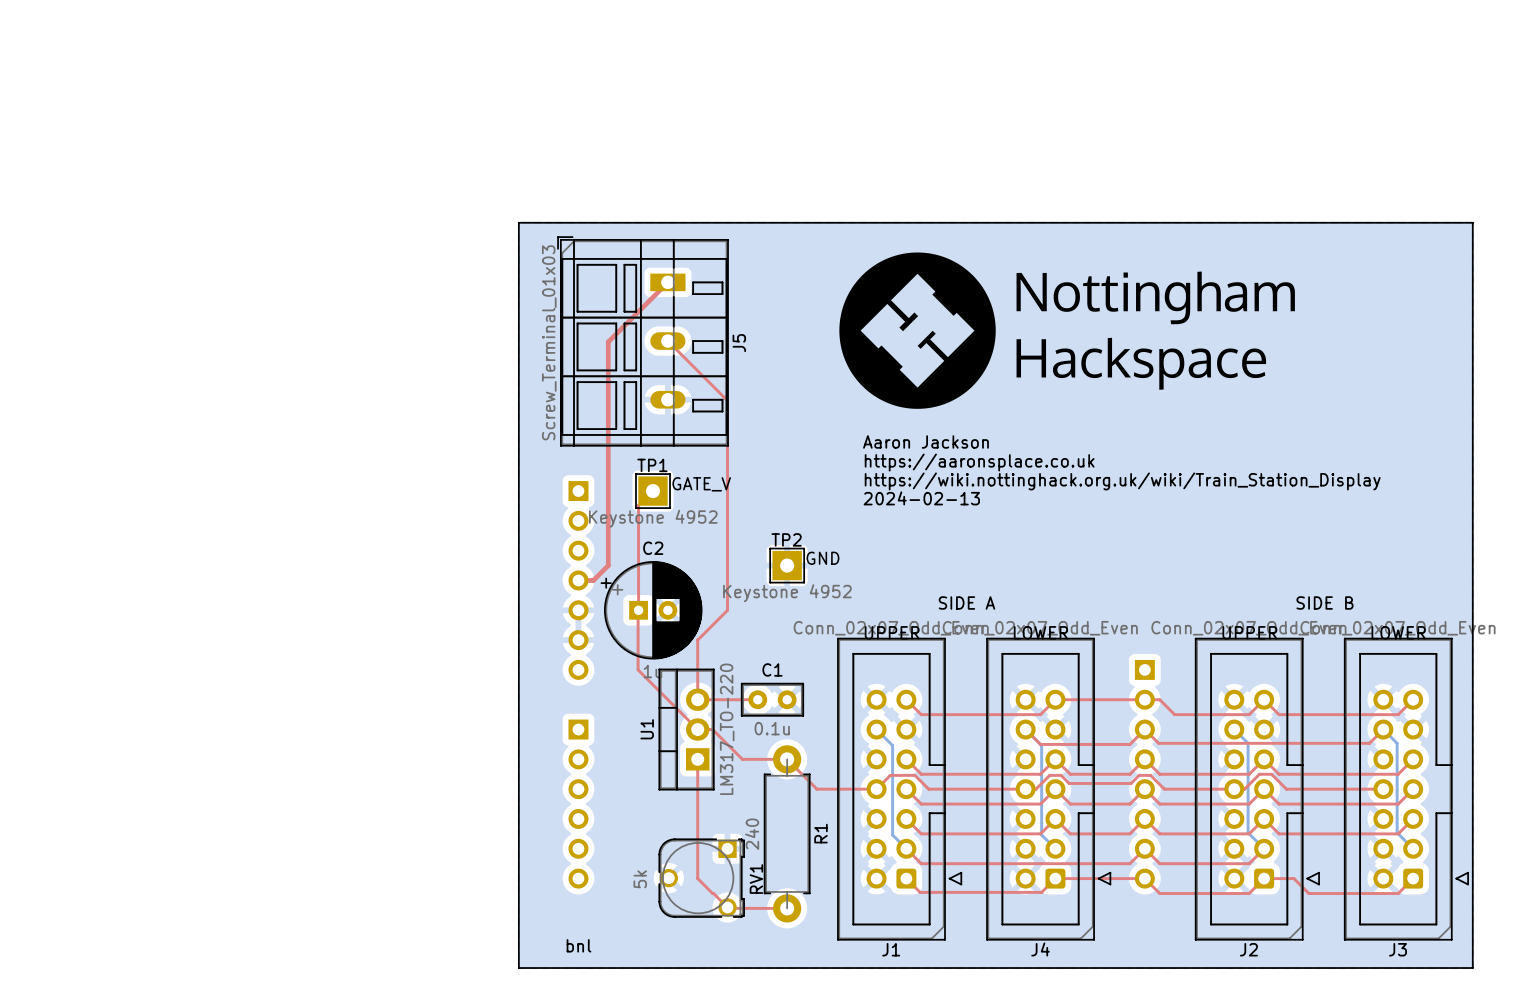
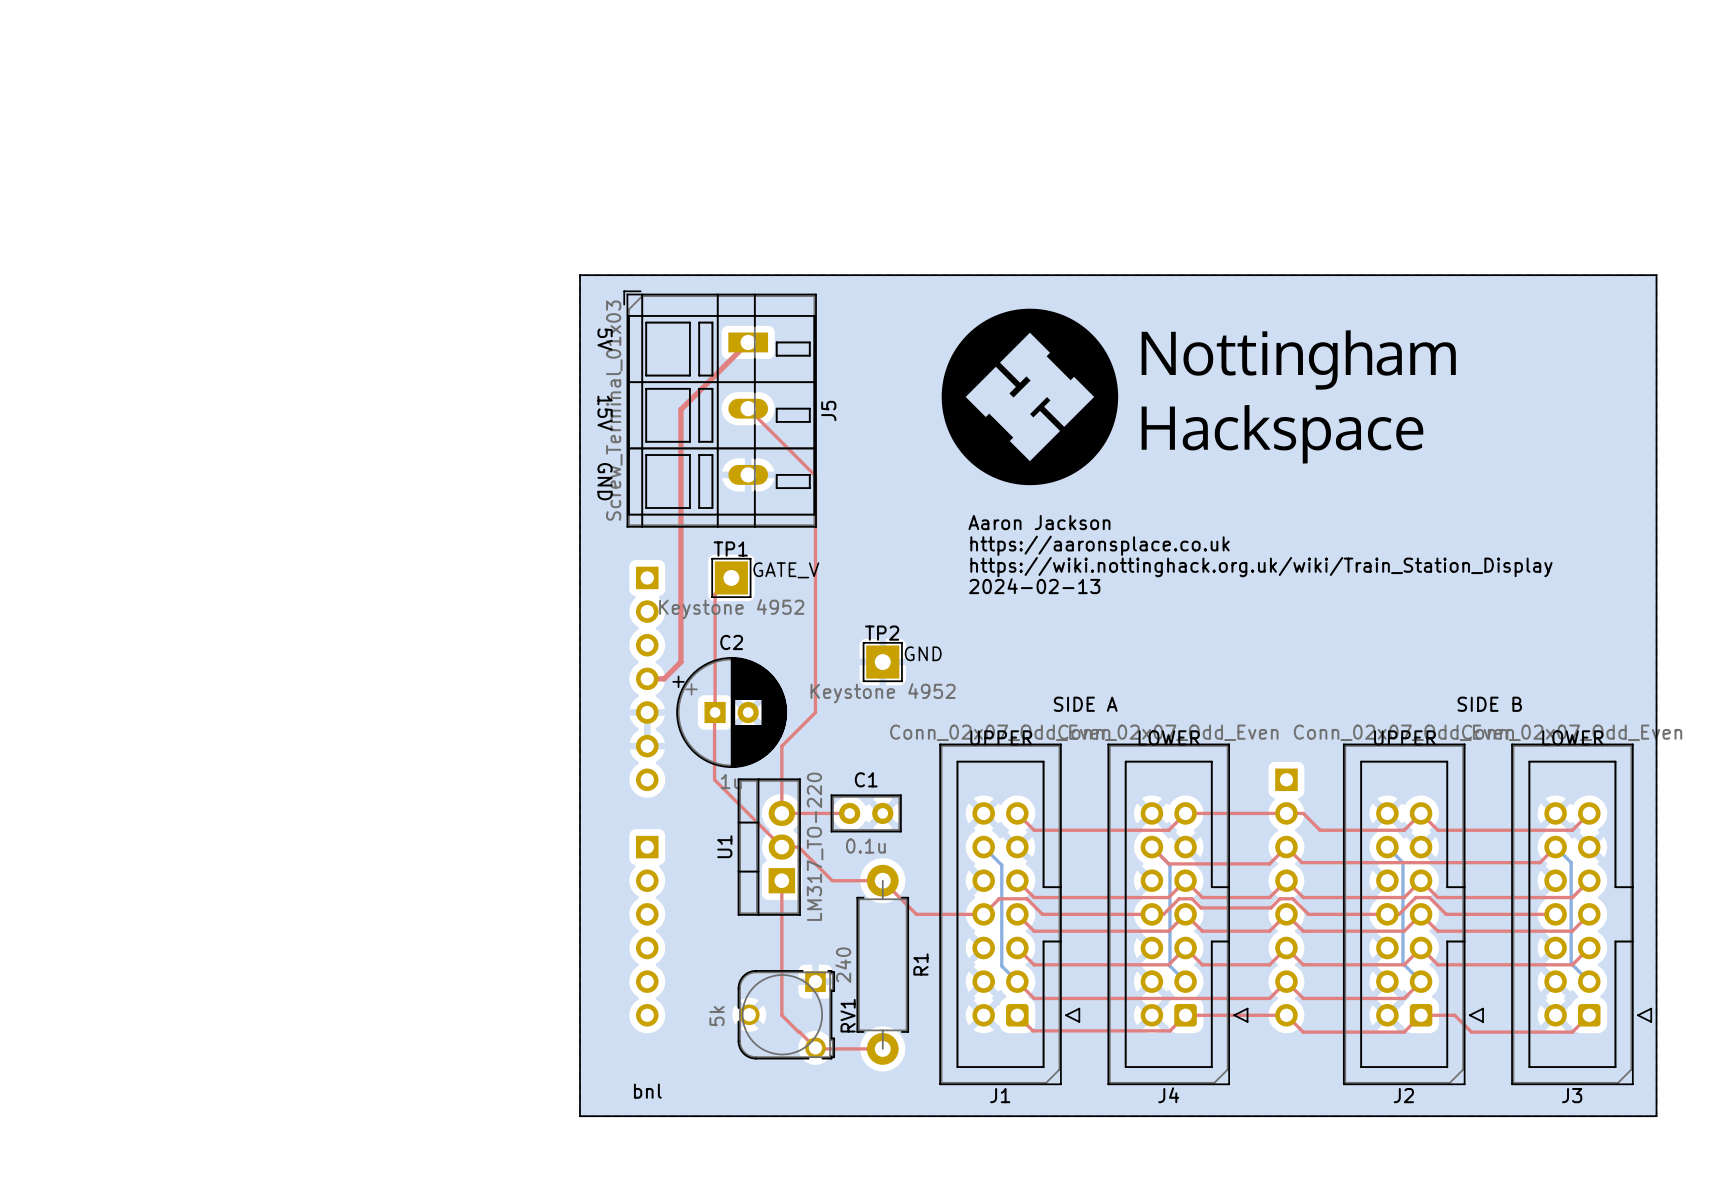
text: none -> 5V (605, 339)
text: none -> 15V (605, 413)
text: none -> GND (605, 481)

